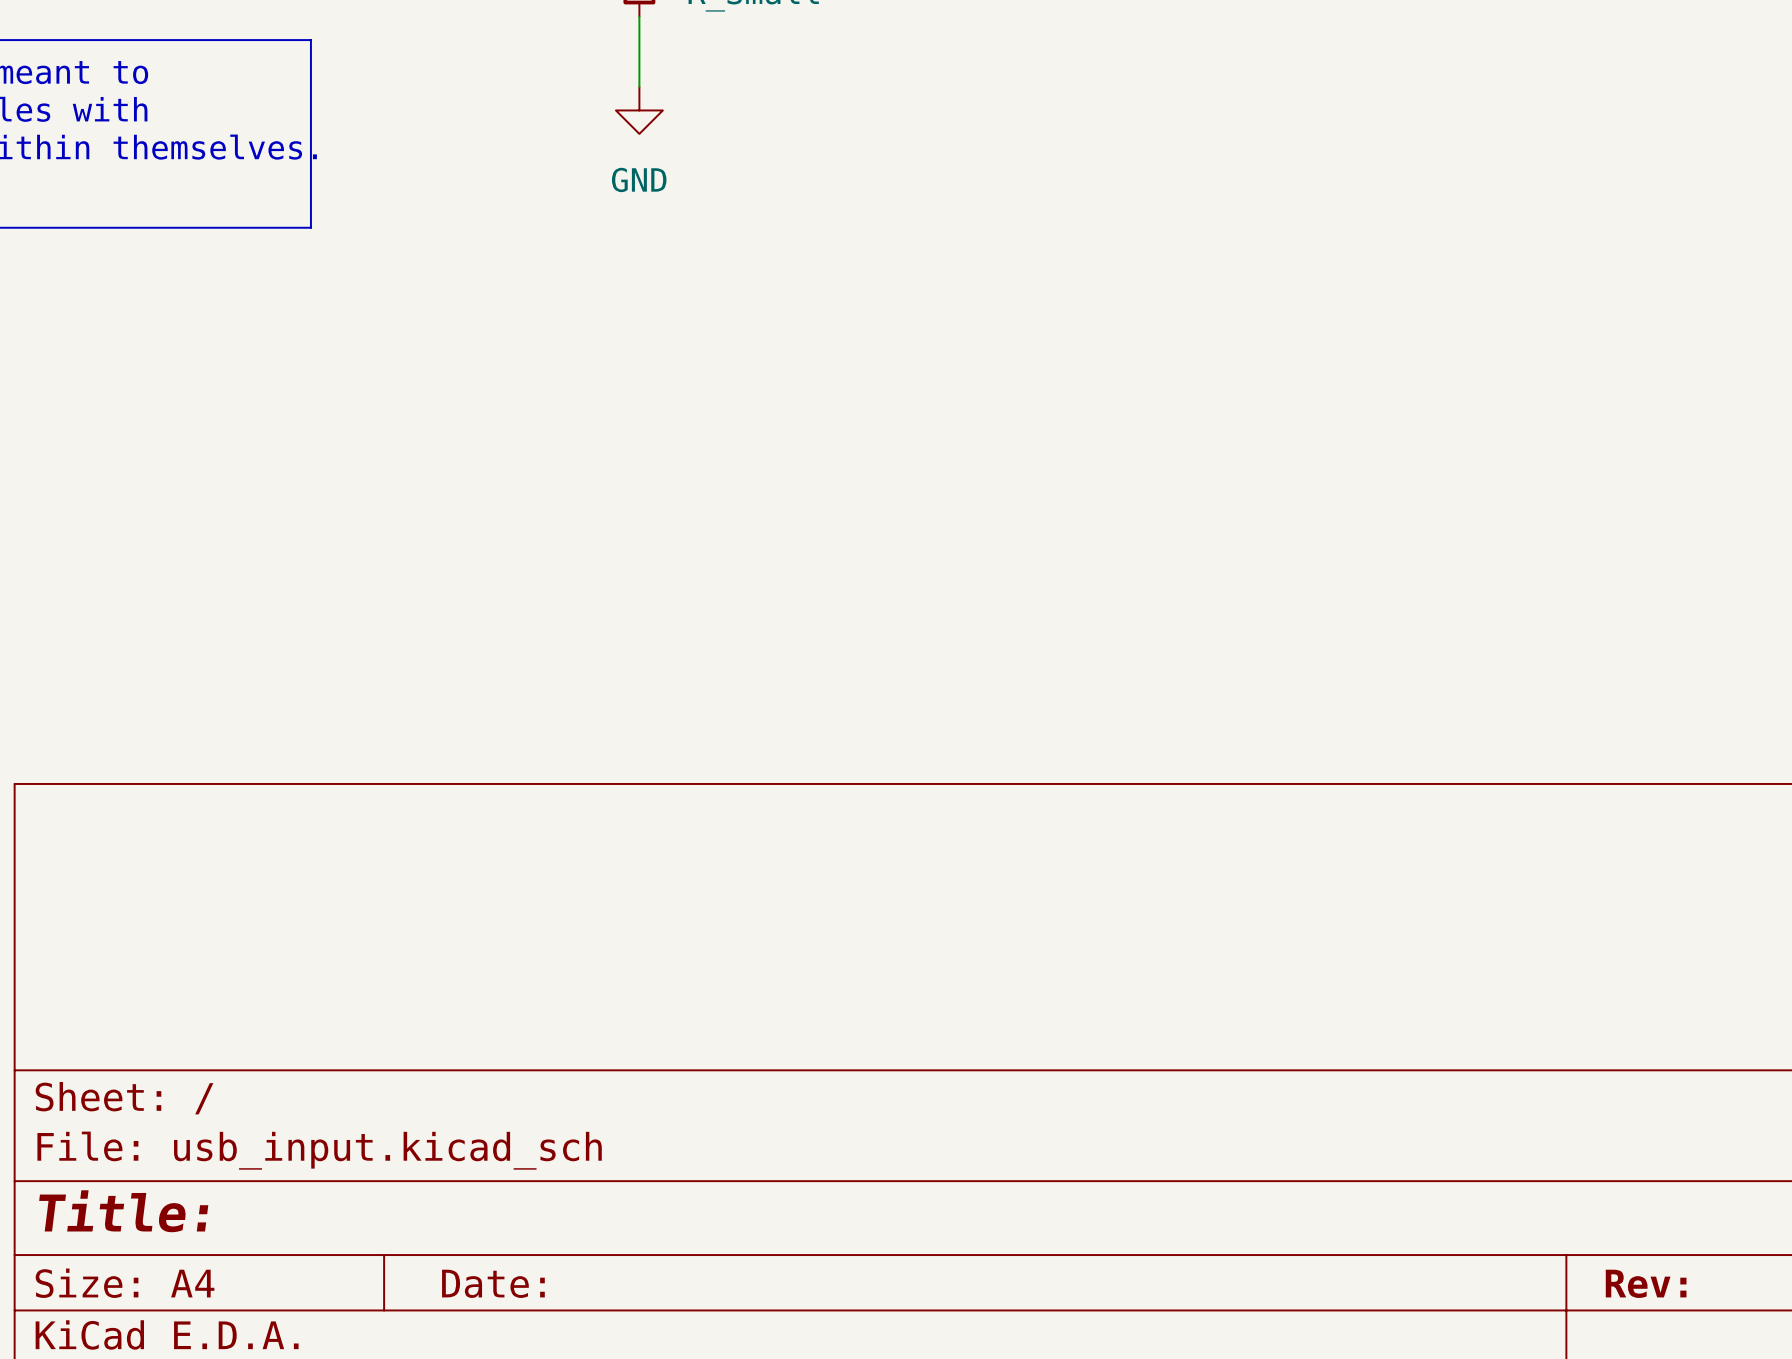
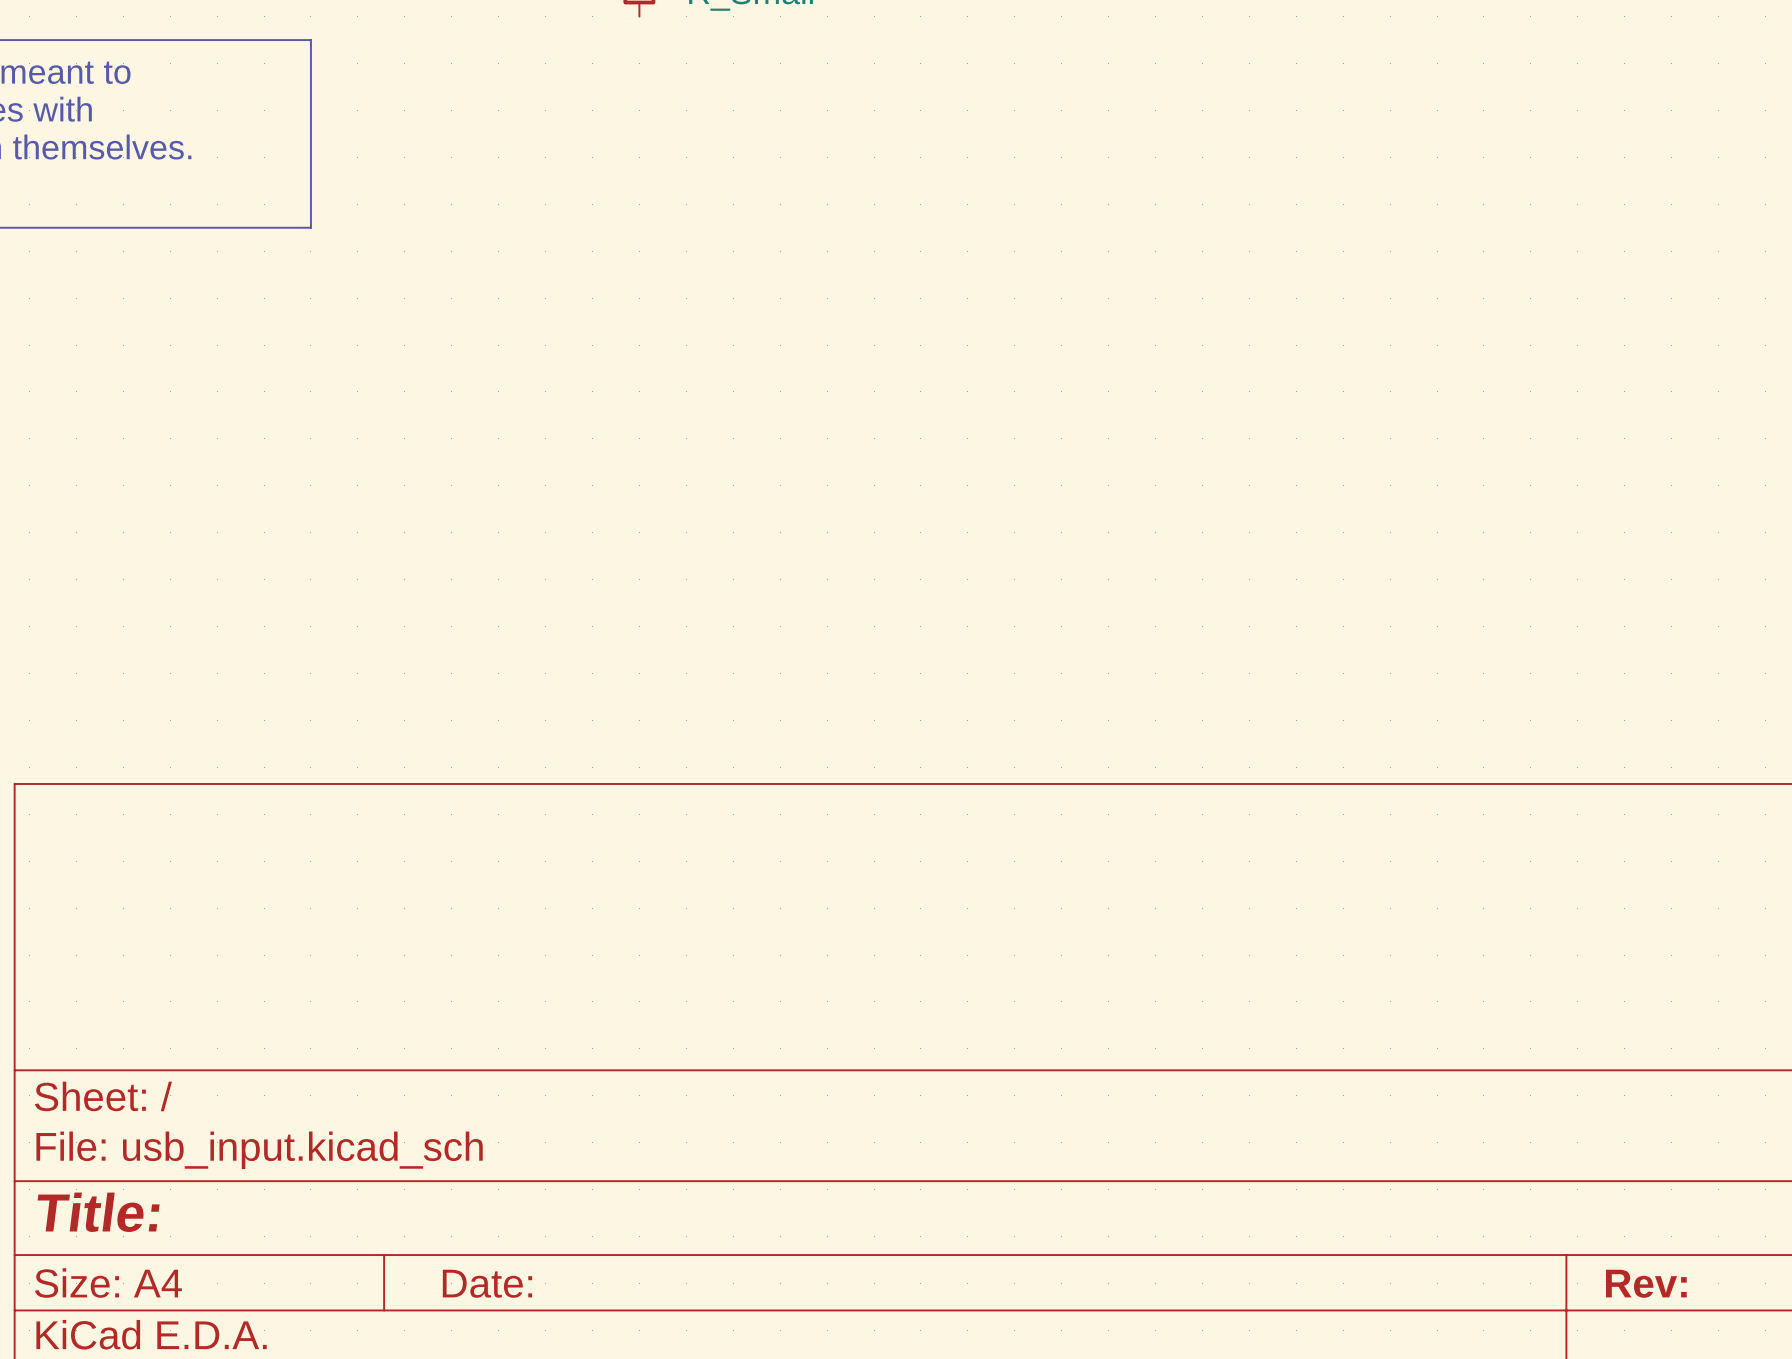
wire: (639, 16) (639, 86) -> none
power symbol: GND (639, 110) -> none

